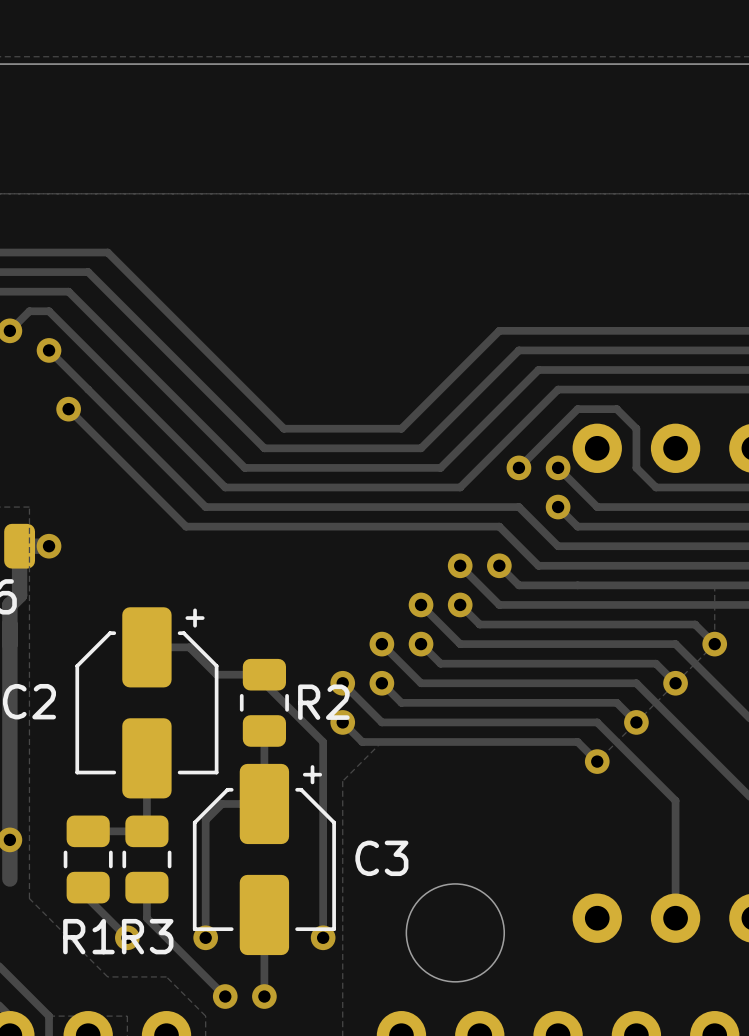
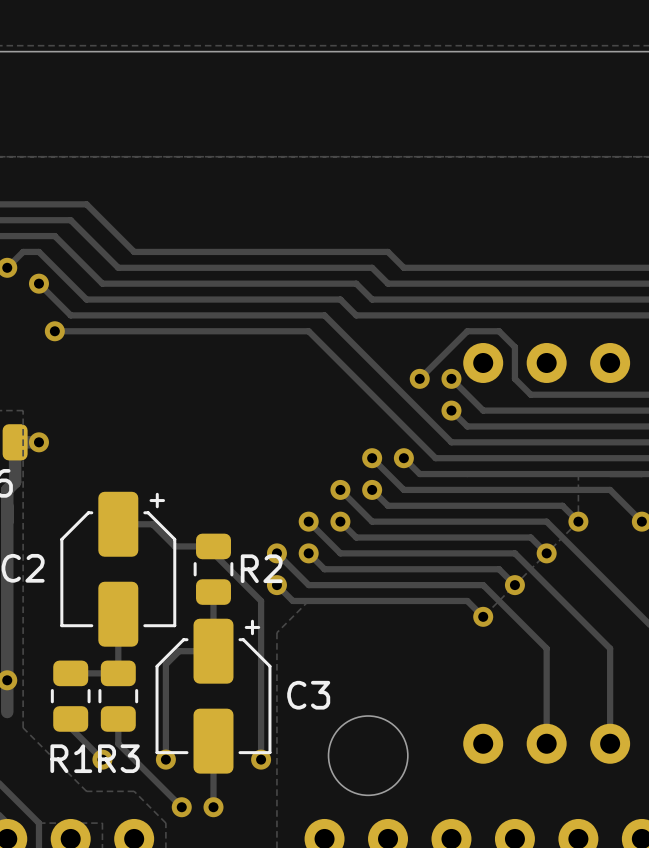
track: (166, 311) (283, 428) (401, 428) (499, 330) -> (134, 251) (388, 251) (403, 267)
track: (146, 330) (264, 448) (421, 448) (518, 350) -> (118, 267) (372, 267) (388, 283) (419, 283)
track: (127, 350) (244, 467) (440, 467) (538, 370) -> (102, 283) (356, 283) (372, 299) (435, 299)
track: (107, 370) (225, 487) (460, 487) (558, 389) -> (86, 299) (340, 299) (356, 315) (451, 315)
track: (88, 389) (205, 507) (518, 507) -> (70, 315) (324, 315) (419, 410)
track: (68, 409) (186, 526) (499, 526) -> (54, 331) (308, 331) (403, 426)

